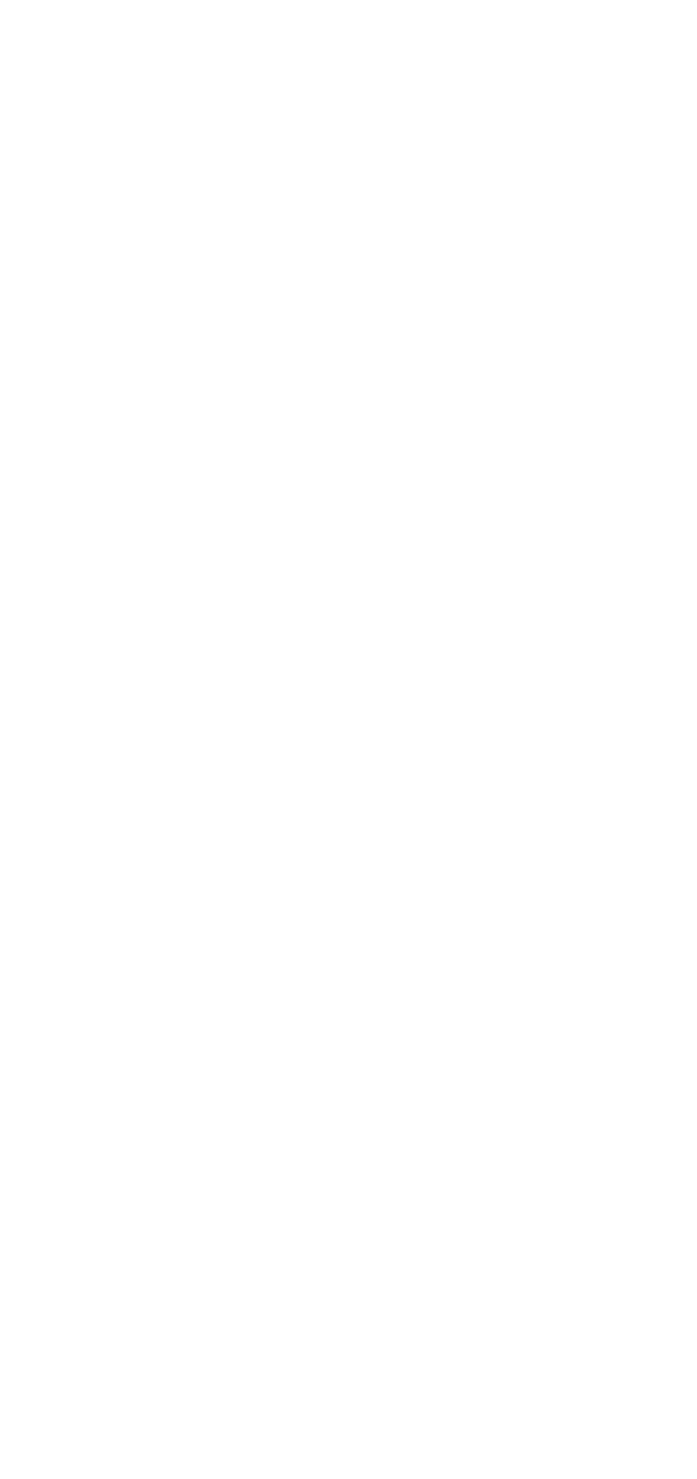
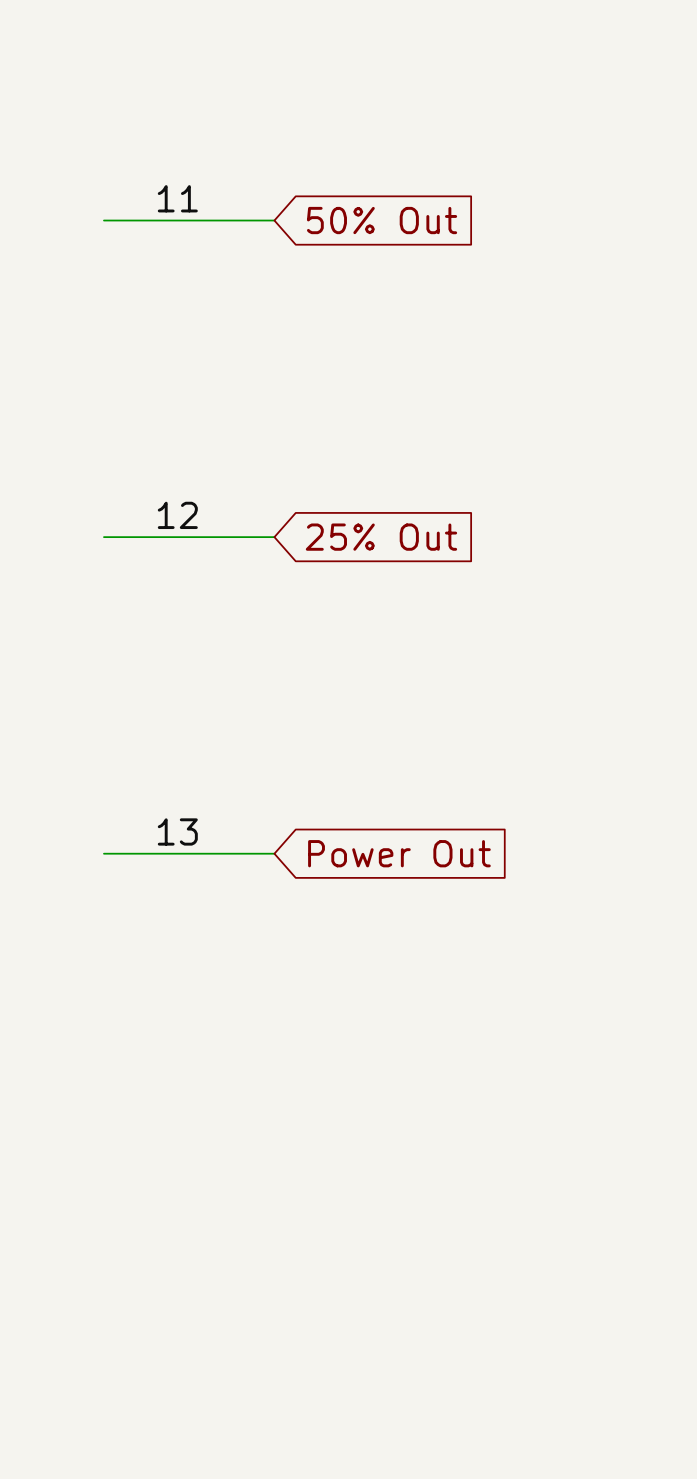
label: none -> 11 (177, 198)
wire: none -> (103, 220) (274, 220)
global label: none -> 50% Out (382, 220)
label: none -> 12 (177, 515)
wire: none -> (103, 537) (274, 537)
global label: none -> 25% Out (381, 537)
label: none -> 13 (177, 831)
wire: none -> (103, 853) (274, 853)
global label: none -> Power Out (399, 853)

